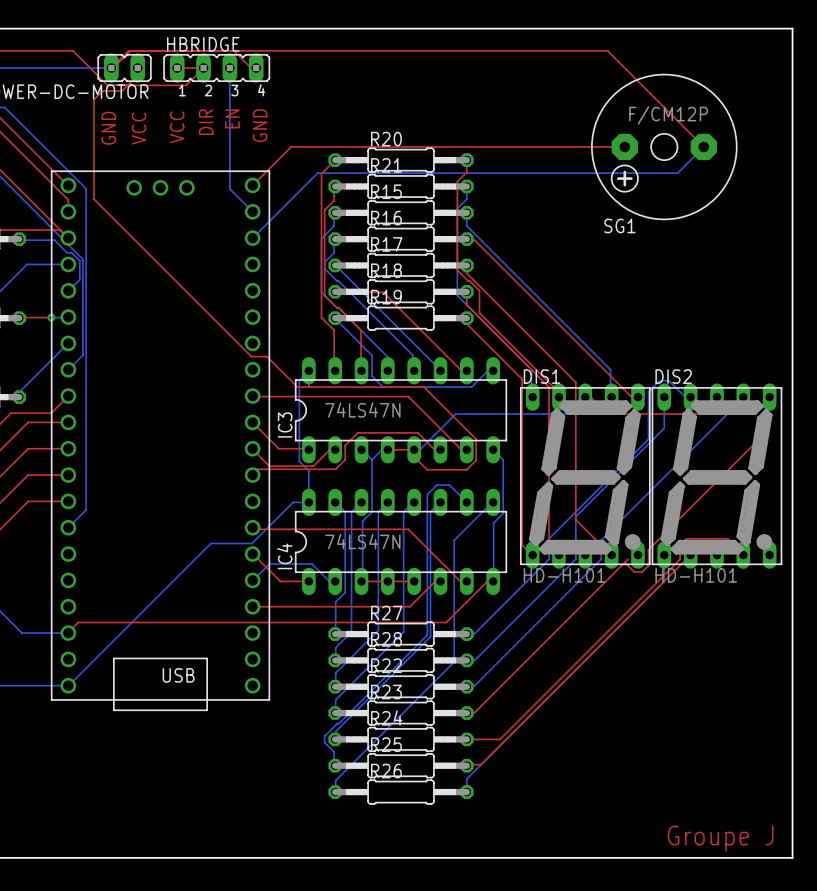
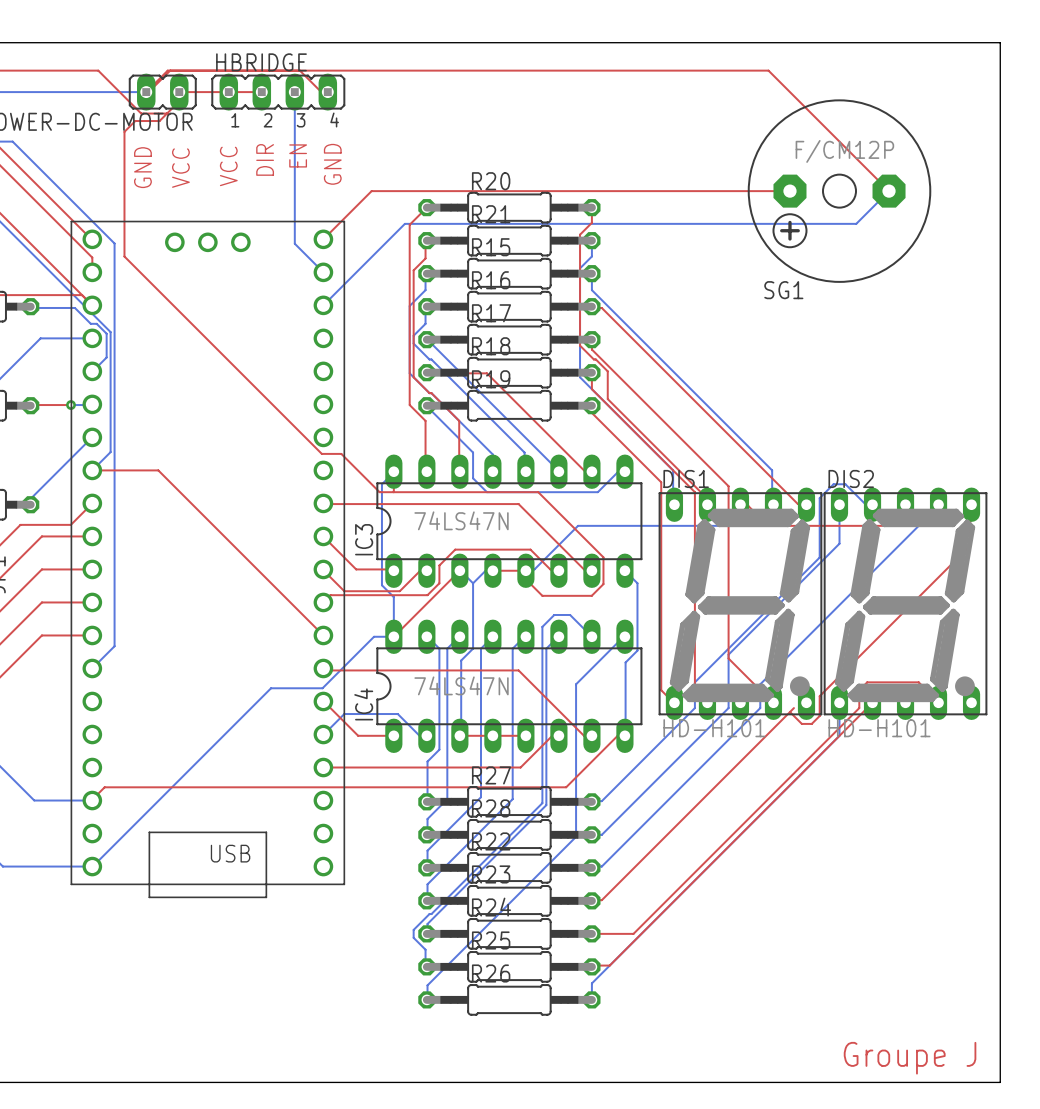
top track: none -> (179, 92) (228, 92)
top track: (203, 68) (186, 85) (128, 85) -> none
top track: none -> (92, 470) (158, 470) (323, 635)
top track: none -> (459, 570) (393, 636)

